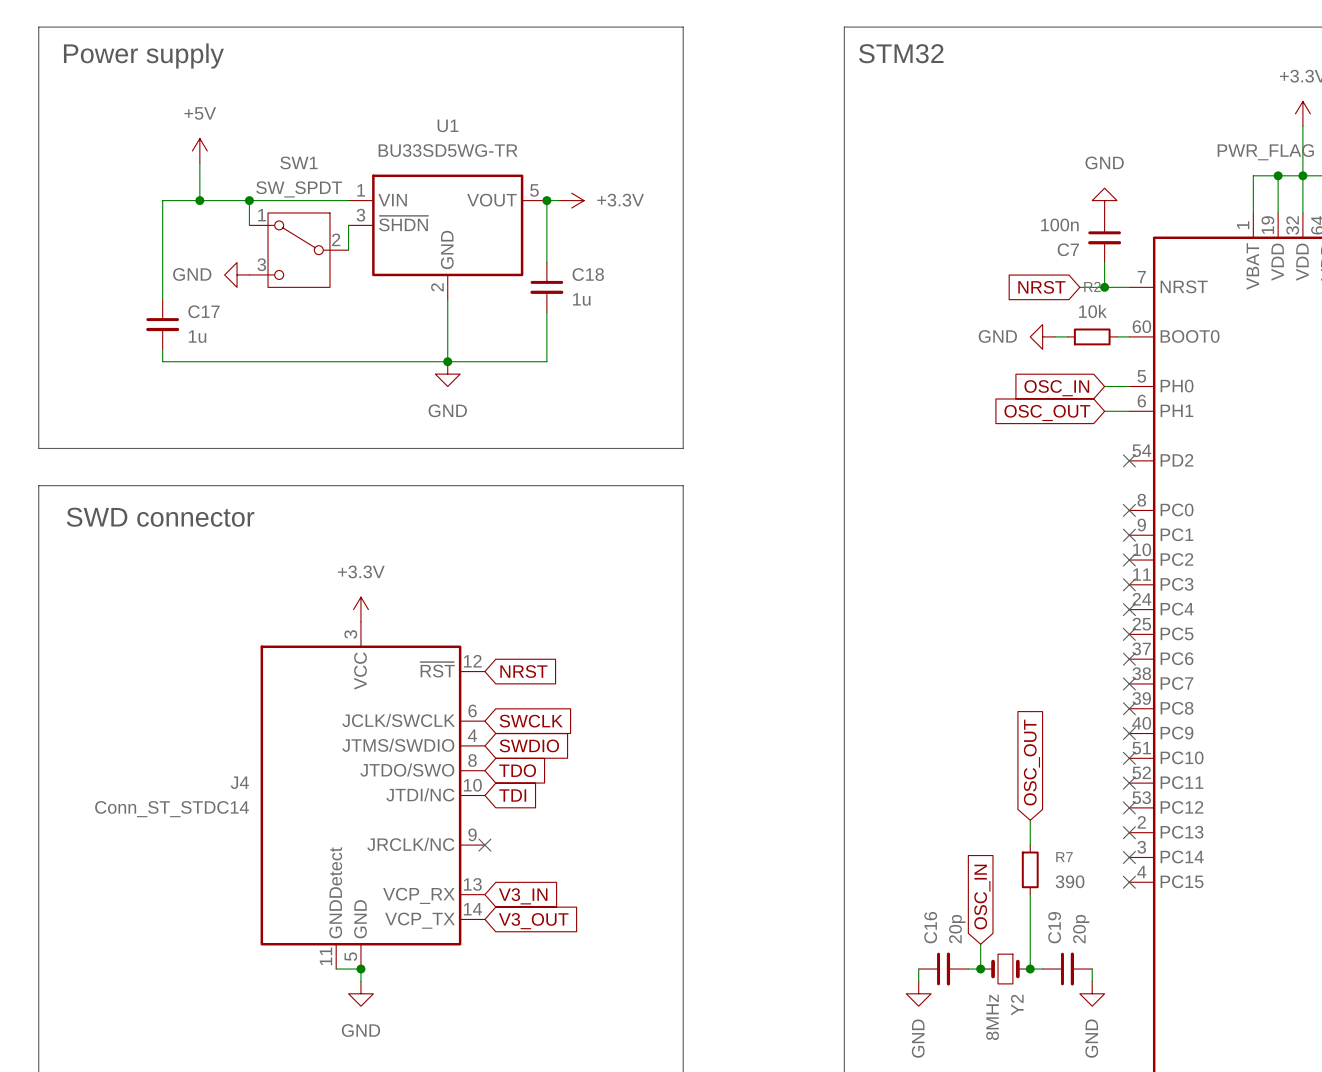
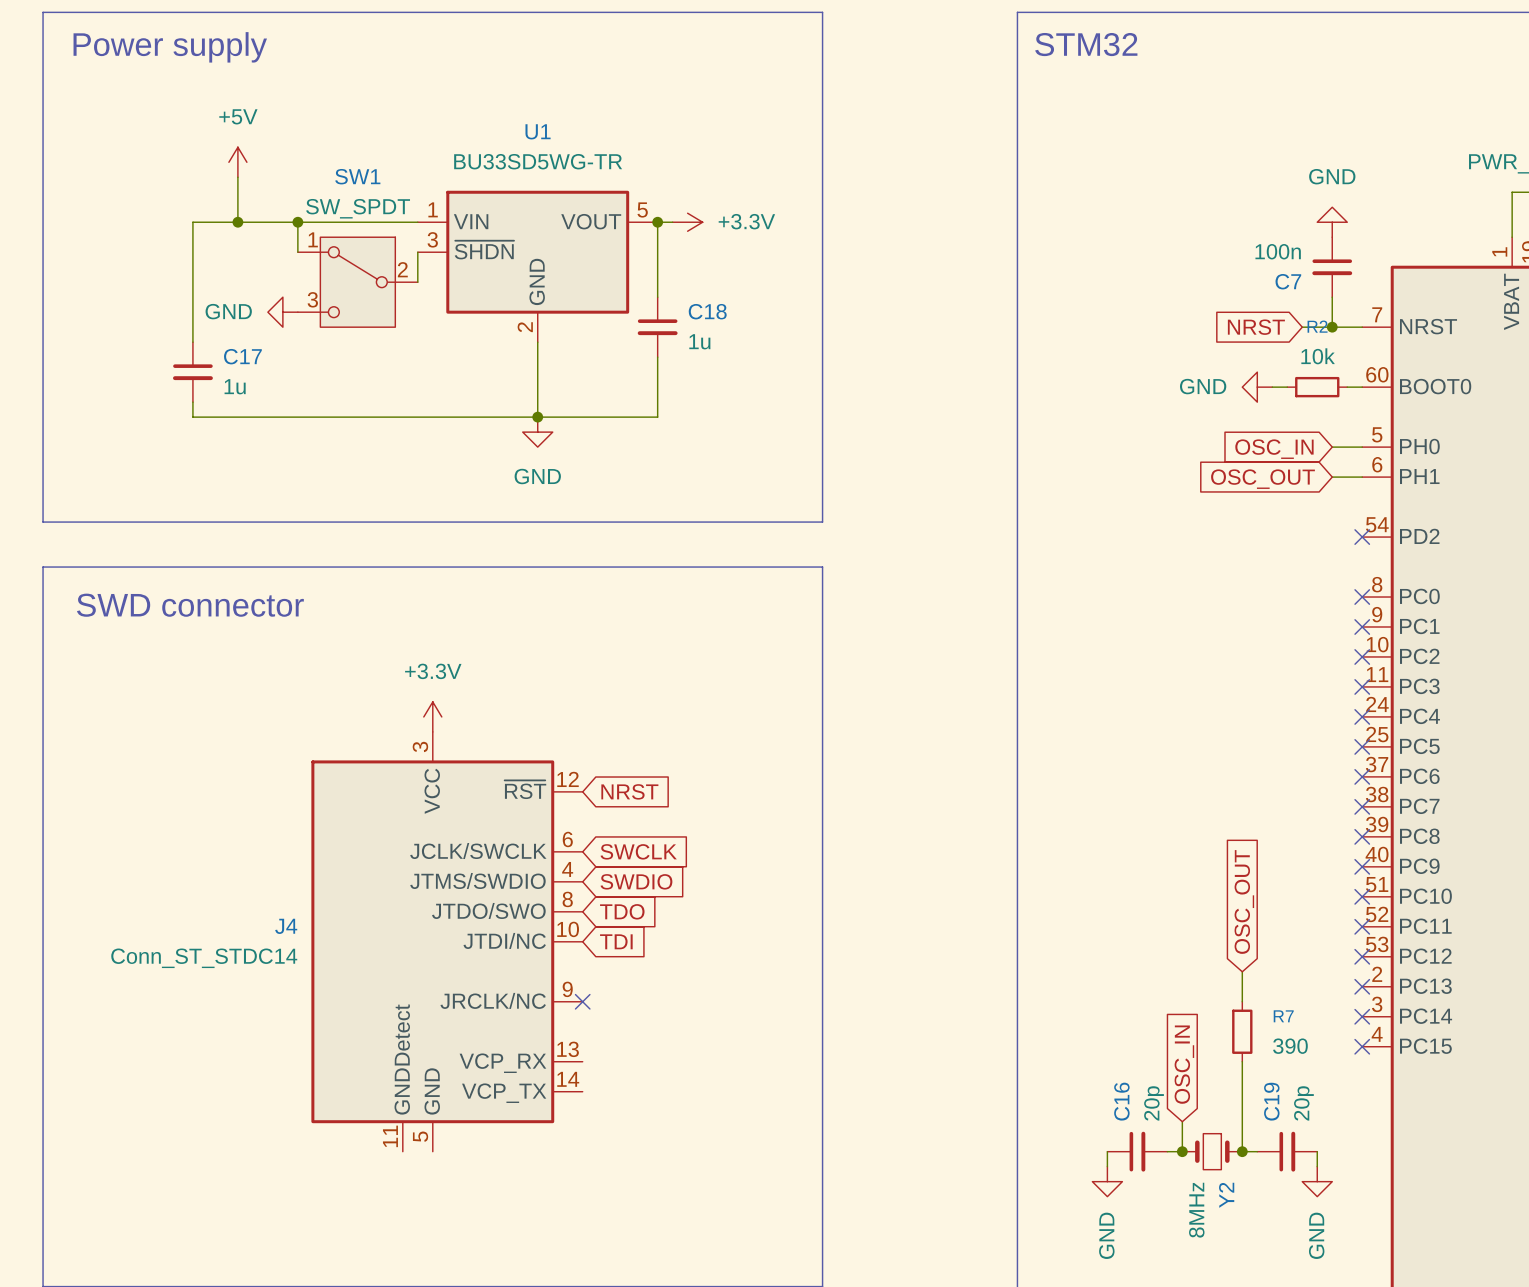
global label: V3_IN (523, 896) -> none
global label: V3_OUT (533, 921) -> none
wire: (336, 969) (360, 969) (360, 981) -> none
junction: (360, 969) -> none
power symbol: GND (360, 993) -> none

